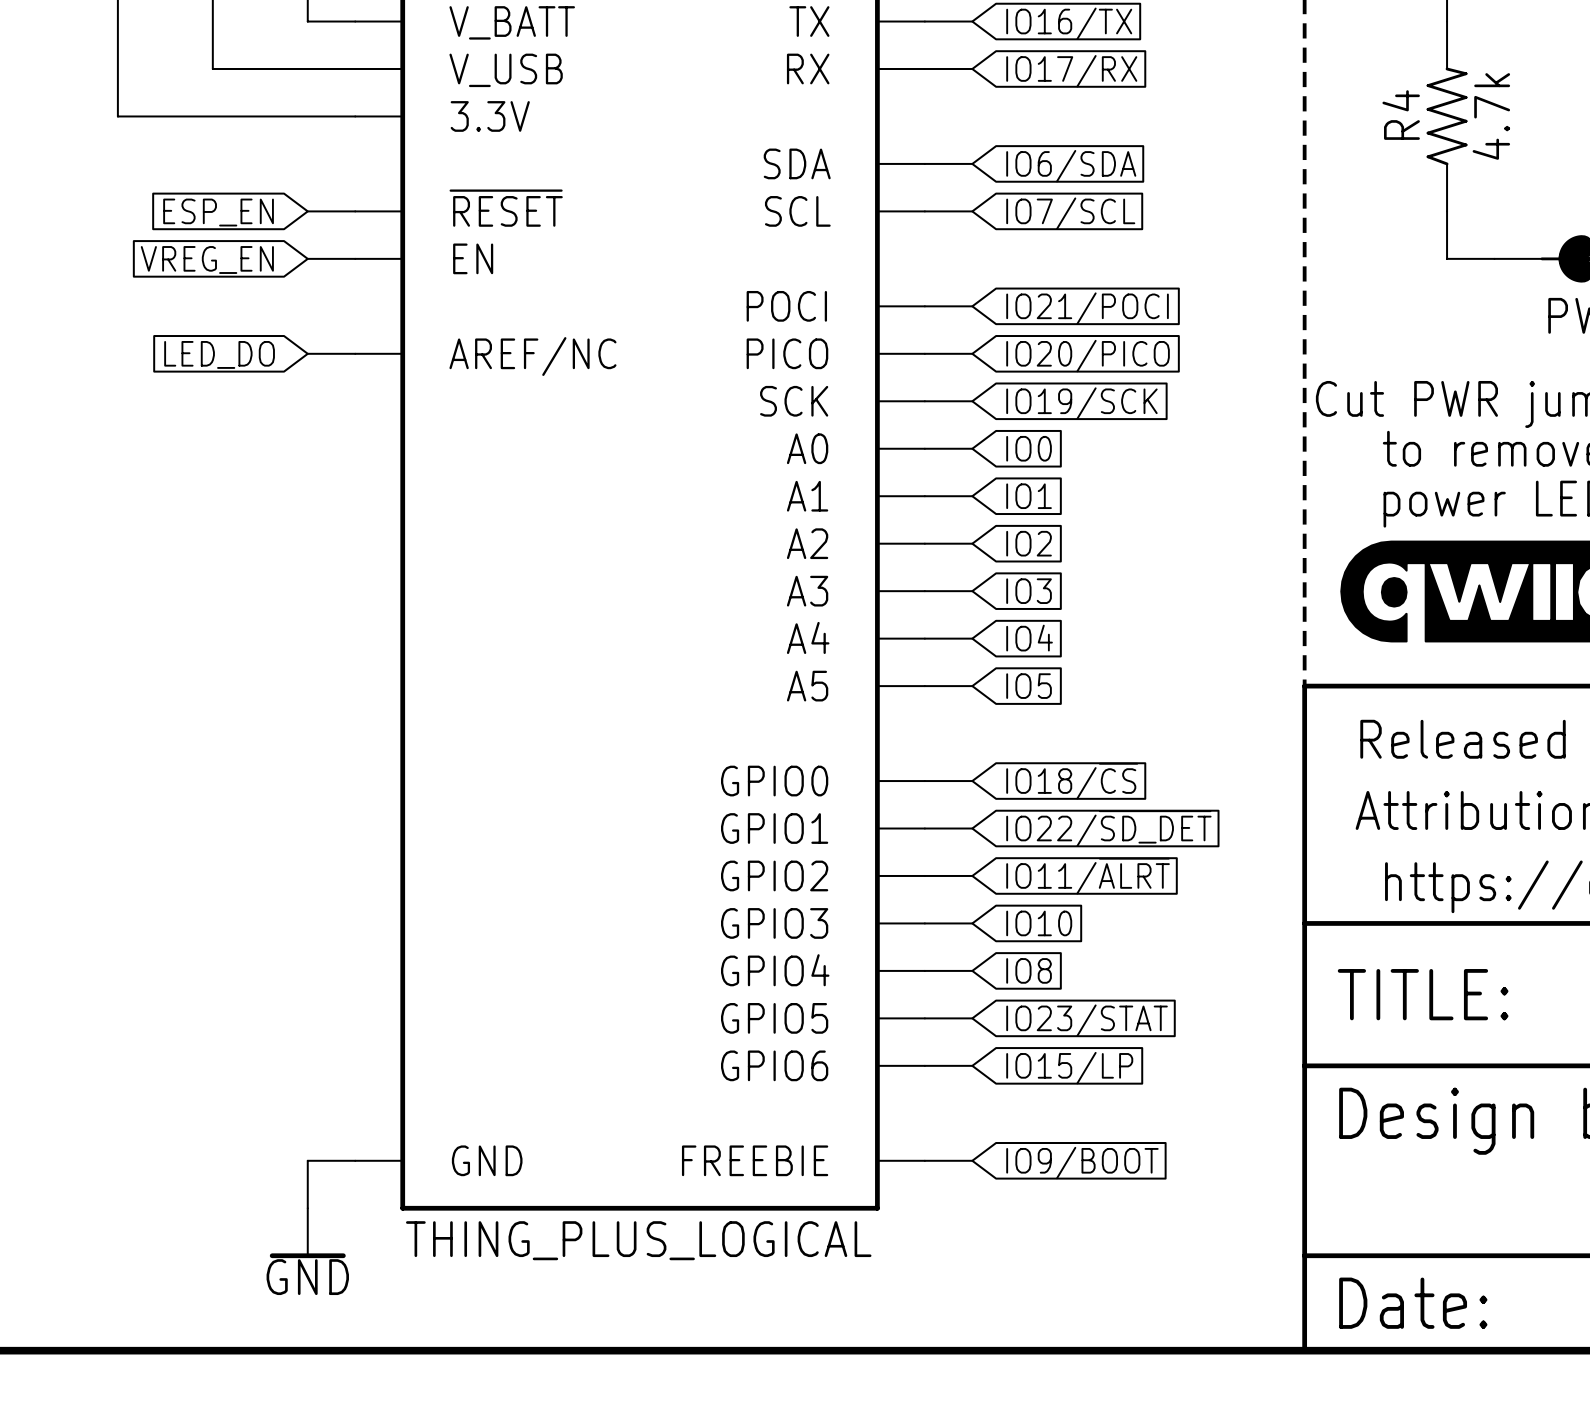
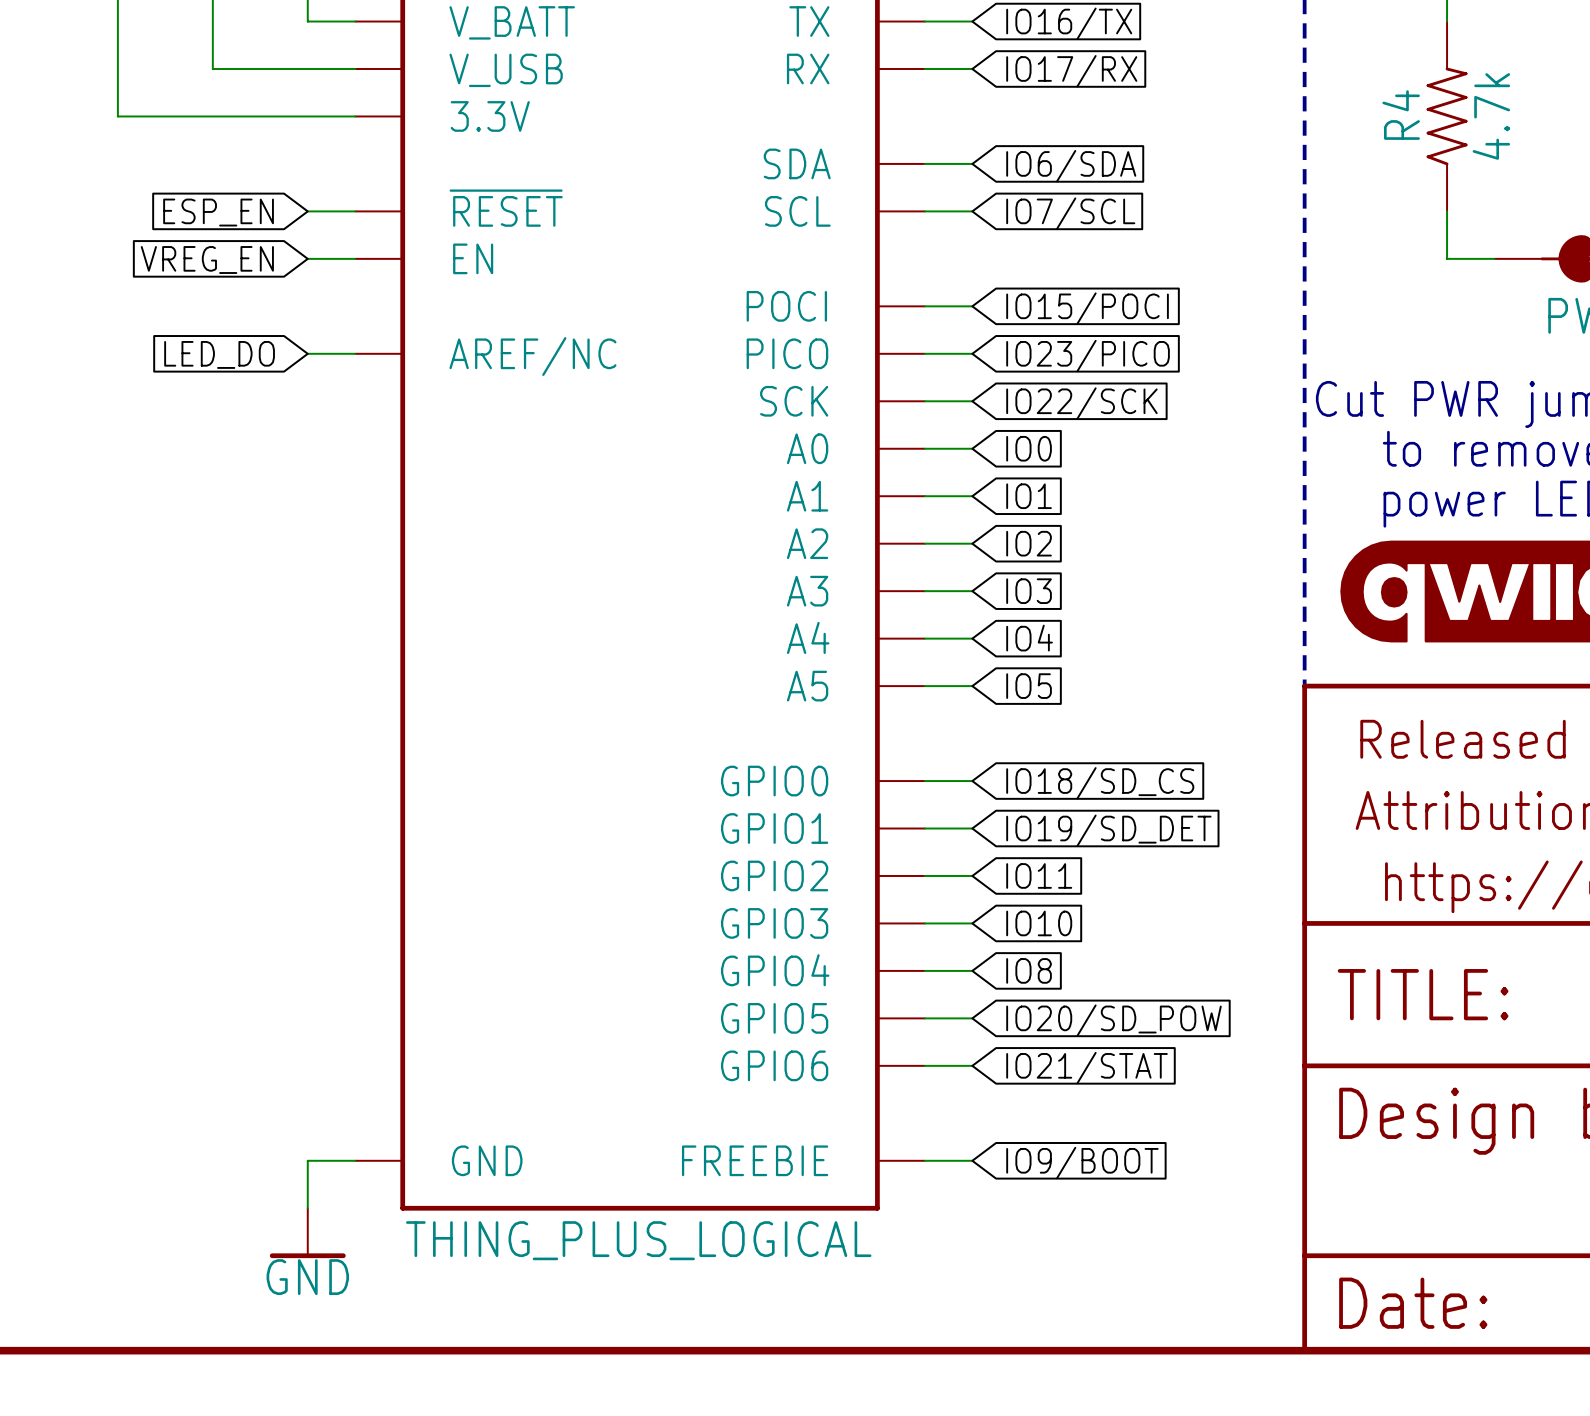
global label: IO21/POCI (1087, 308) -> IO15/POCI (1087, 308)
global label: IO20/PICO (1088, 356) -> IO23/PICO (1088, 356)
global label: IO19/SCK (1081, 403) -> IO22/SCK (1081, 403)
global label: IO18/~{CS} (1072, 781) -> IO18/SD_CS (1100, 783)
global label: IO22/~{SD_DET} (1108, 828) -> IO19/SD_DET (1108, 830)
global label: IO11/~{ALRT} (1088, 876) -> IO11 (1039, 875)
global label: IO23/STAT (1087, 1020) -> IO20/SD_POW (1113, 1020)
global label: IO15/LP (1069, 1068) -> IO21/STAT (1087, 1068)

